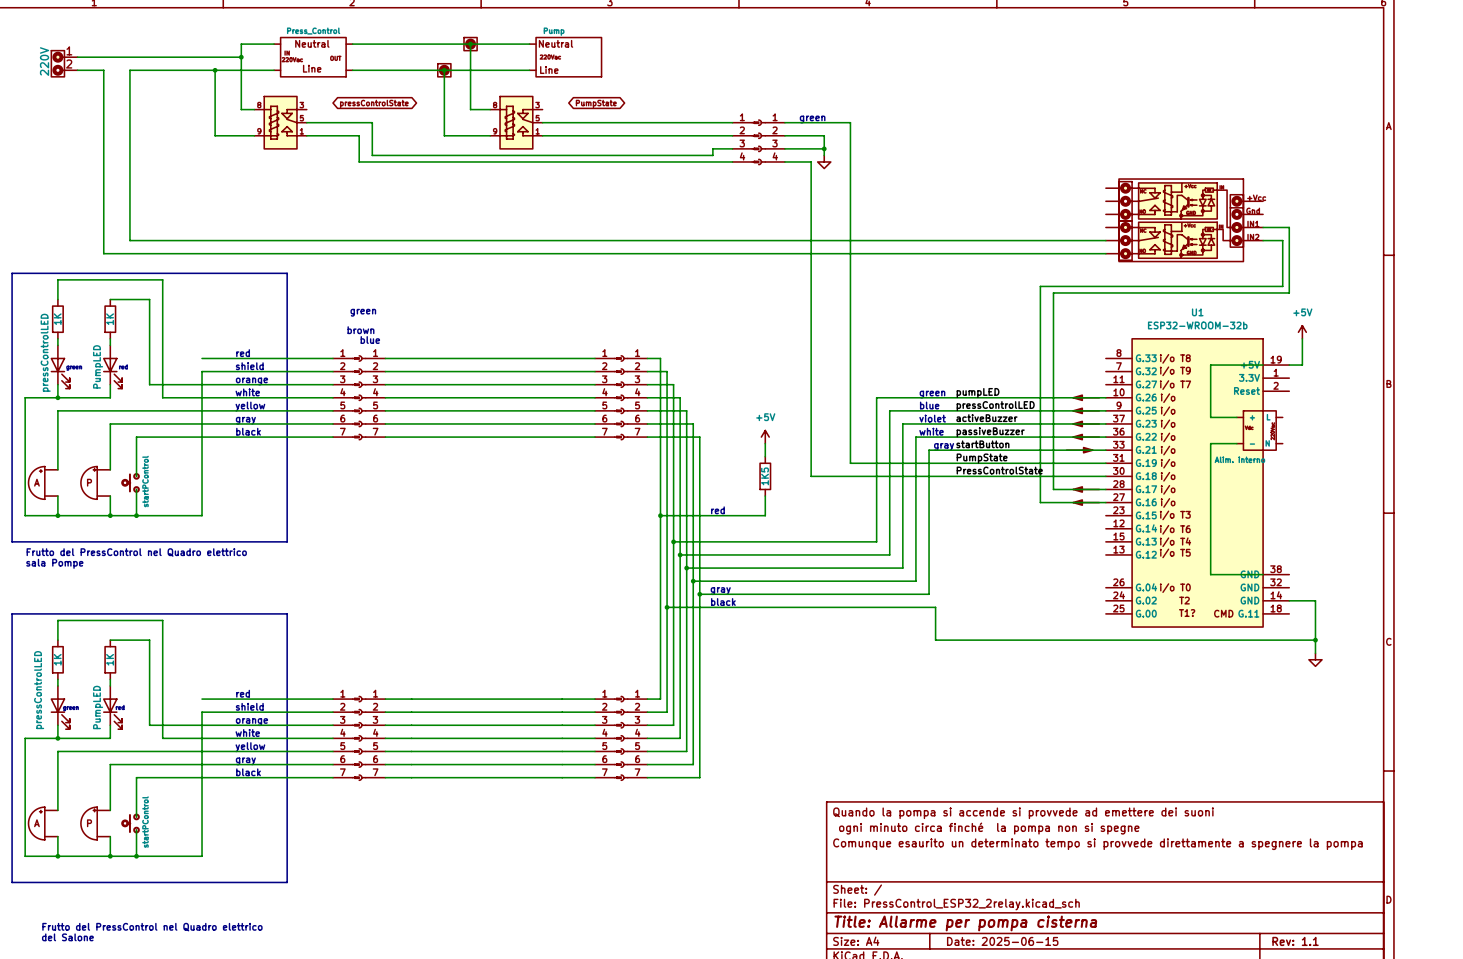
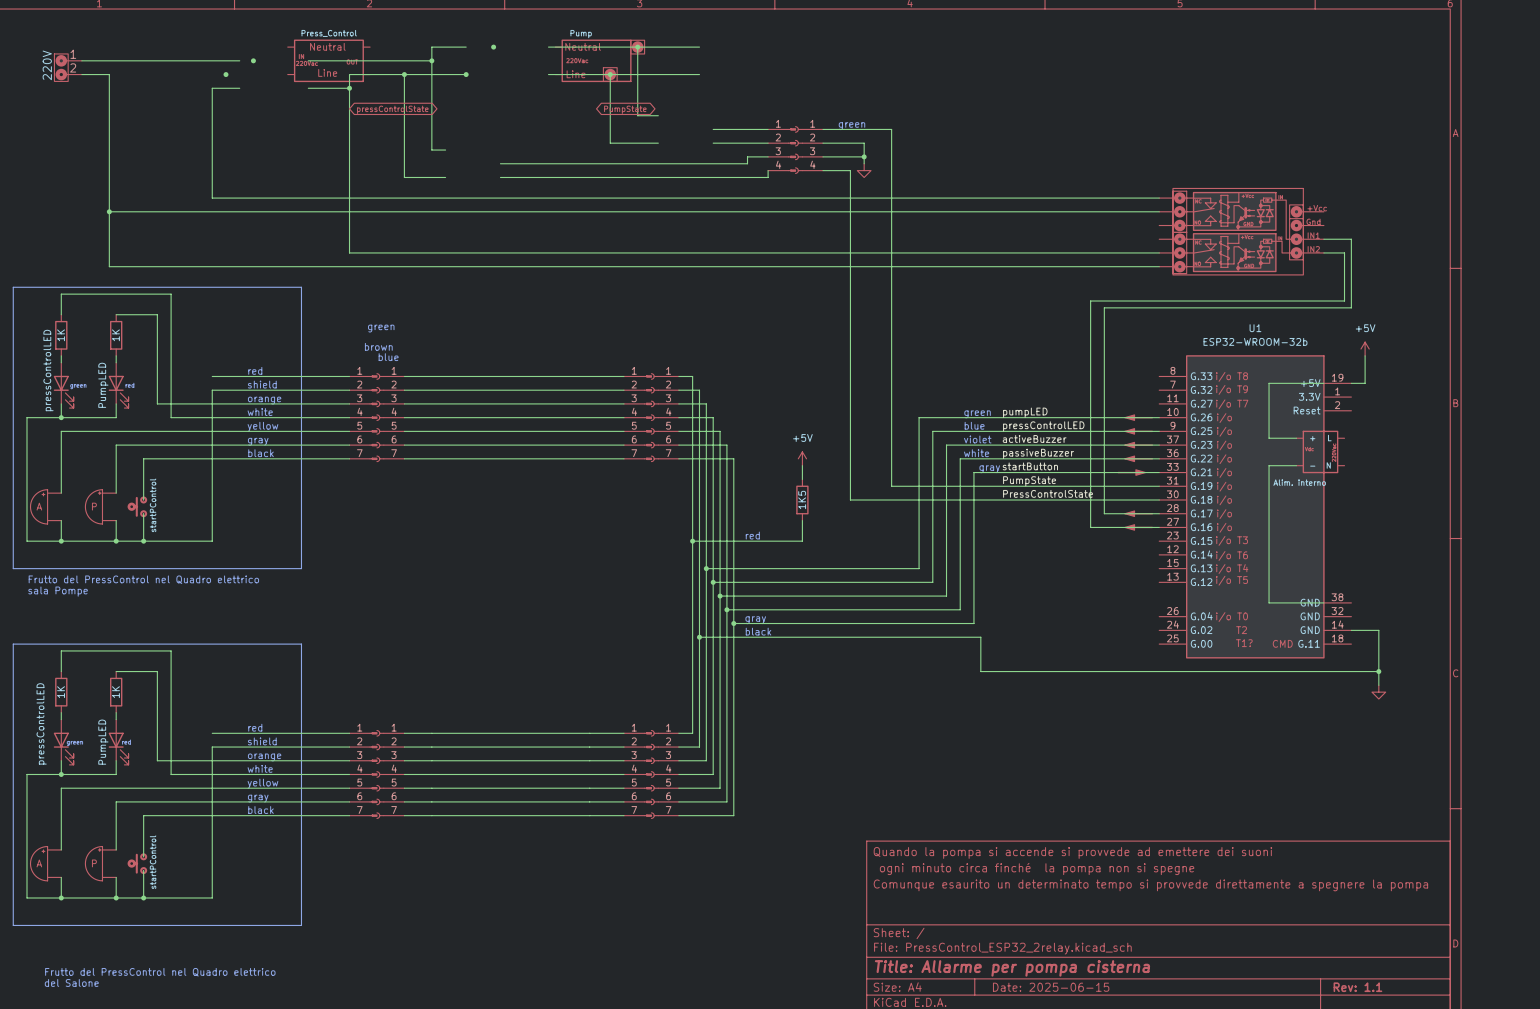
wire: (274, 44) (241, 44) (241, 109) (254, 109) -> none
wire: (352, 44) (411, 44) -> (445, 150) (431, 150) (431, 47)
wire: (444, 44) (522, 44) -> none
wire: (470, 44) (470, 109) (490, 109) -> none
part: (470, 44) -> none
wire: none -> (555, 47) (699, 47)
wire: none -> (637, 47) (637, 115) (658, 115)
part: none -> (637, 47)
junction: none -> (637, 47)
wire: (228, 57) (241, 57) -> none
wire: none -> (308, 60) (431, 60)
junction: none -> (431, 60)
wire: (215, 70) (215, 135) (254, 135) -> none
wire: (274, 70) (129, 70) (129, 240) (333, 240) -> (370, 74) (349, 74) (349, 252)
wire: none -> (404, 74) (404, 177) (445, 177)
junction: none -> (404, 74)
part: (444, 70) -> none
wire: (522, 70) (444, 70) (444, 135) (490, 135) -> none
part: none -> (610, 74)
junction: none -> (610, 74)
wire: none -> (239, 88) (212, 88) (212, 198) (1159, 198)
wire: none -> (308, 88) (349, 88)
junction: none -> (349, 88)
part: (280, 122) -> none
wire: (306, 122) (372, 122) (372, 155) (477, 155) -> none
part: (516, 122) -> none
wire: (542, 122) (680, 122) -> (555, 74) (699, 74)
wire: (306, 135) (359, 135) (359, 161) (732, 161) -> (500, 177) (768, 177) (768, 170)
wire: (542, 135) (581, 135) -> (610, 74) (610, 143)
wire: (627, 135) (680, 135) -> none
wire: none -> (109, 211) (1159, 211)
junction: none -> (109, 211)

